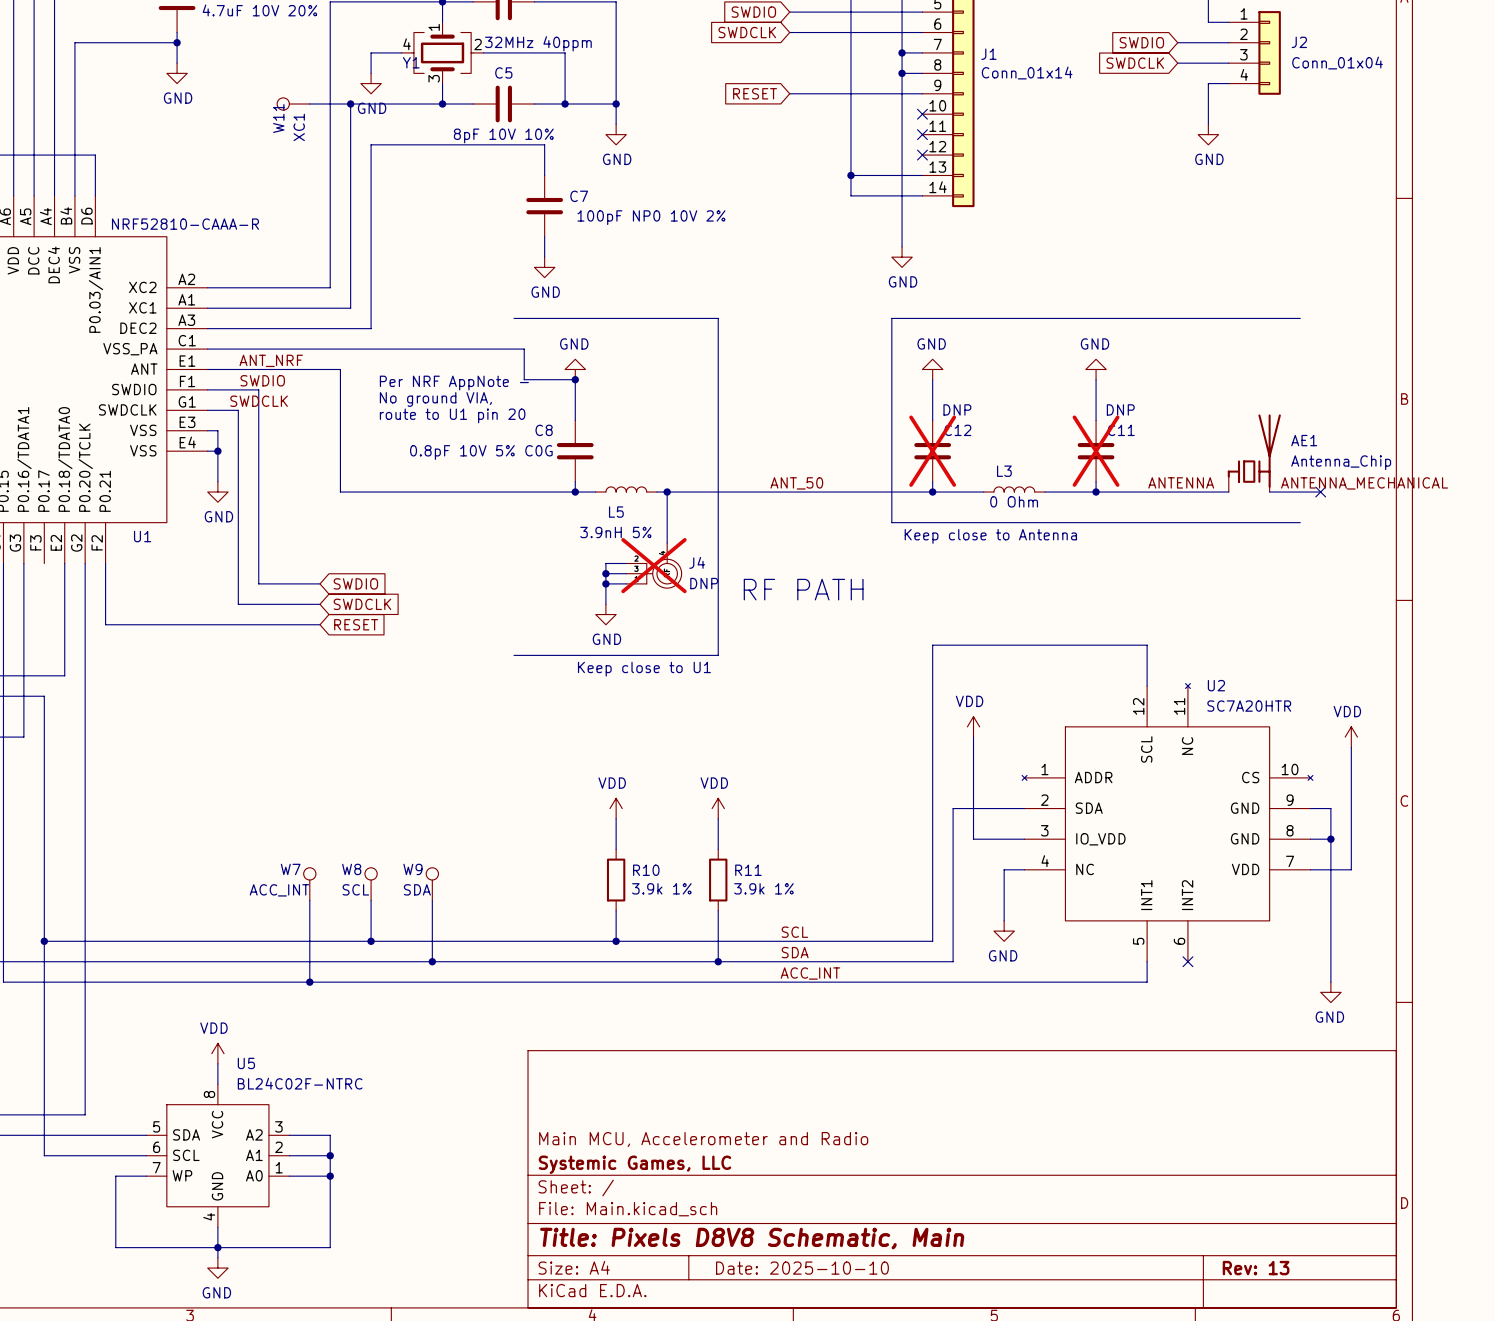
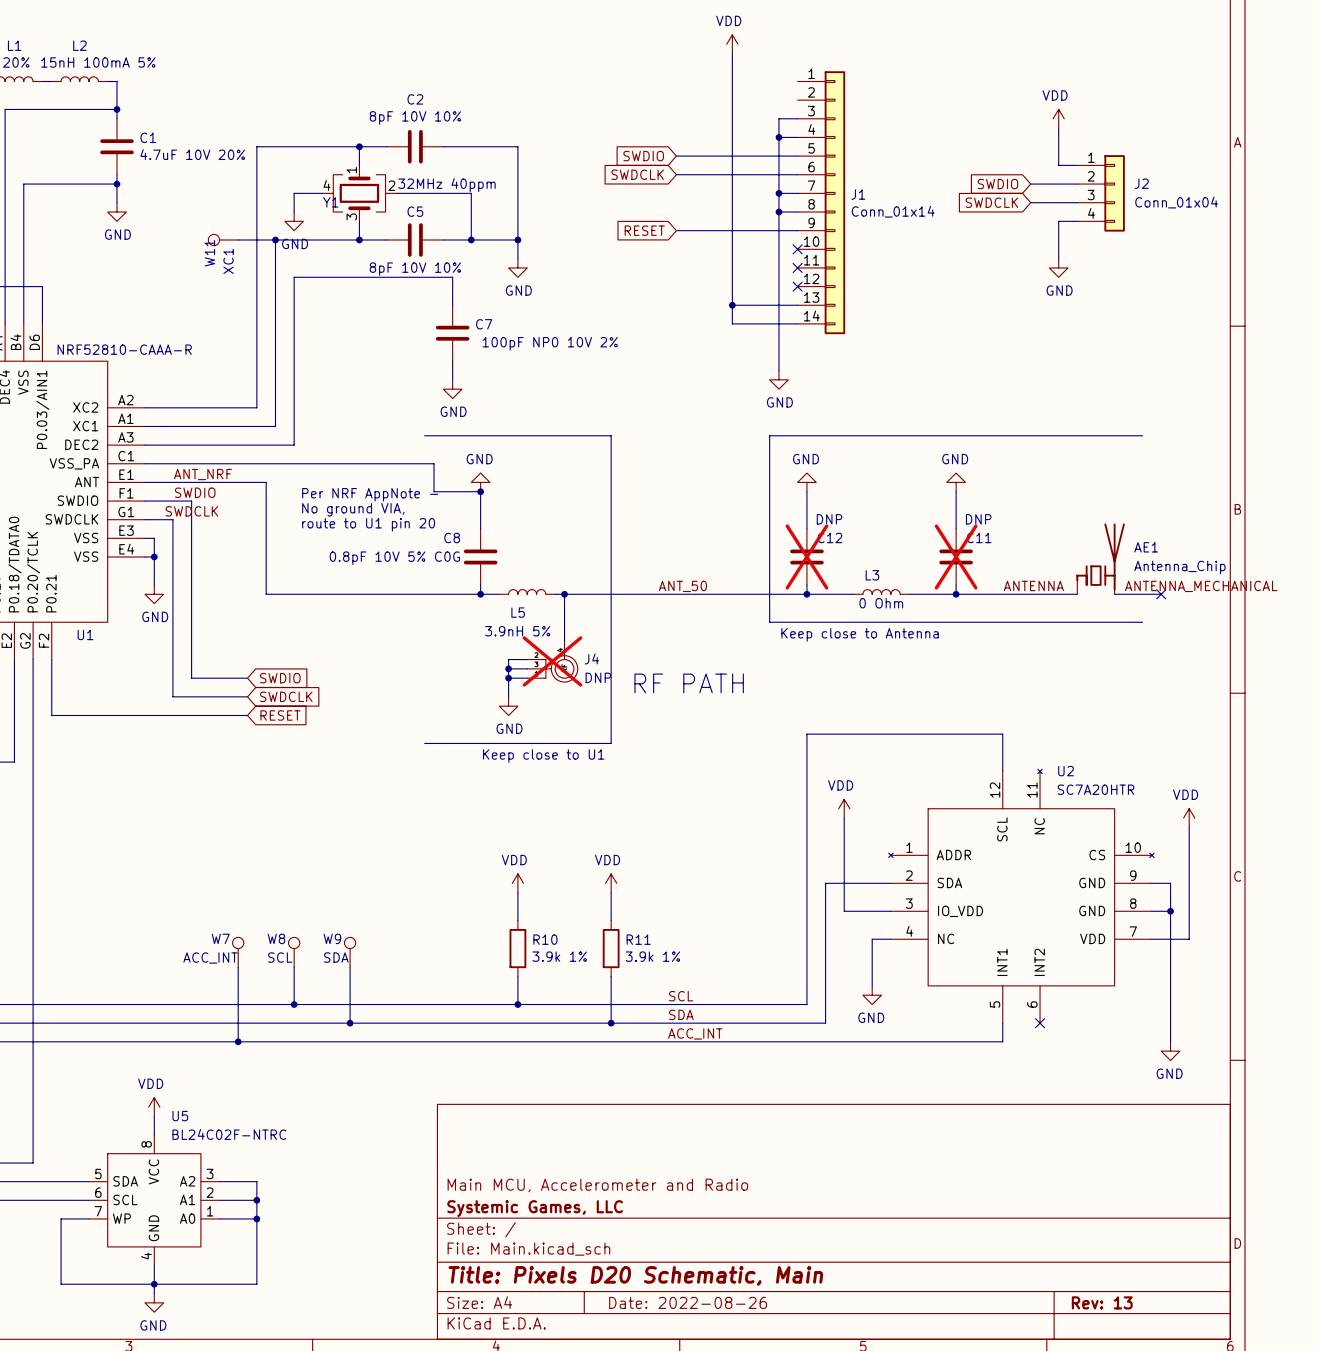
title block: Title: Pixels D8V8 Schematic, Main (752, 1238) -> Title: Pixels D20 Schematic, Main (635, 1275)
title block: Date: 2025-10-10 (802, 1268) -> Date: 2022-08-26 (688, 1302)

